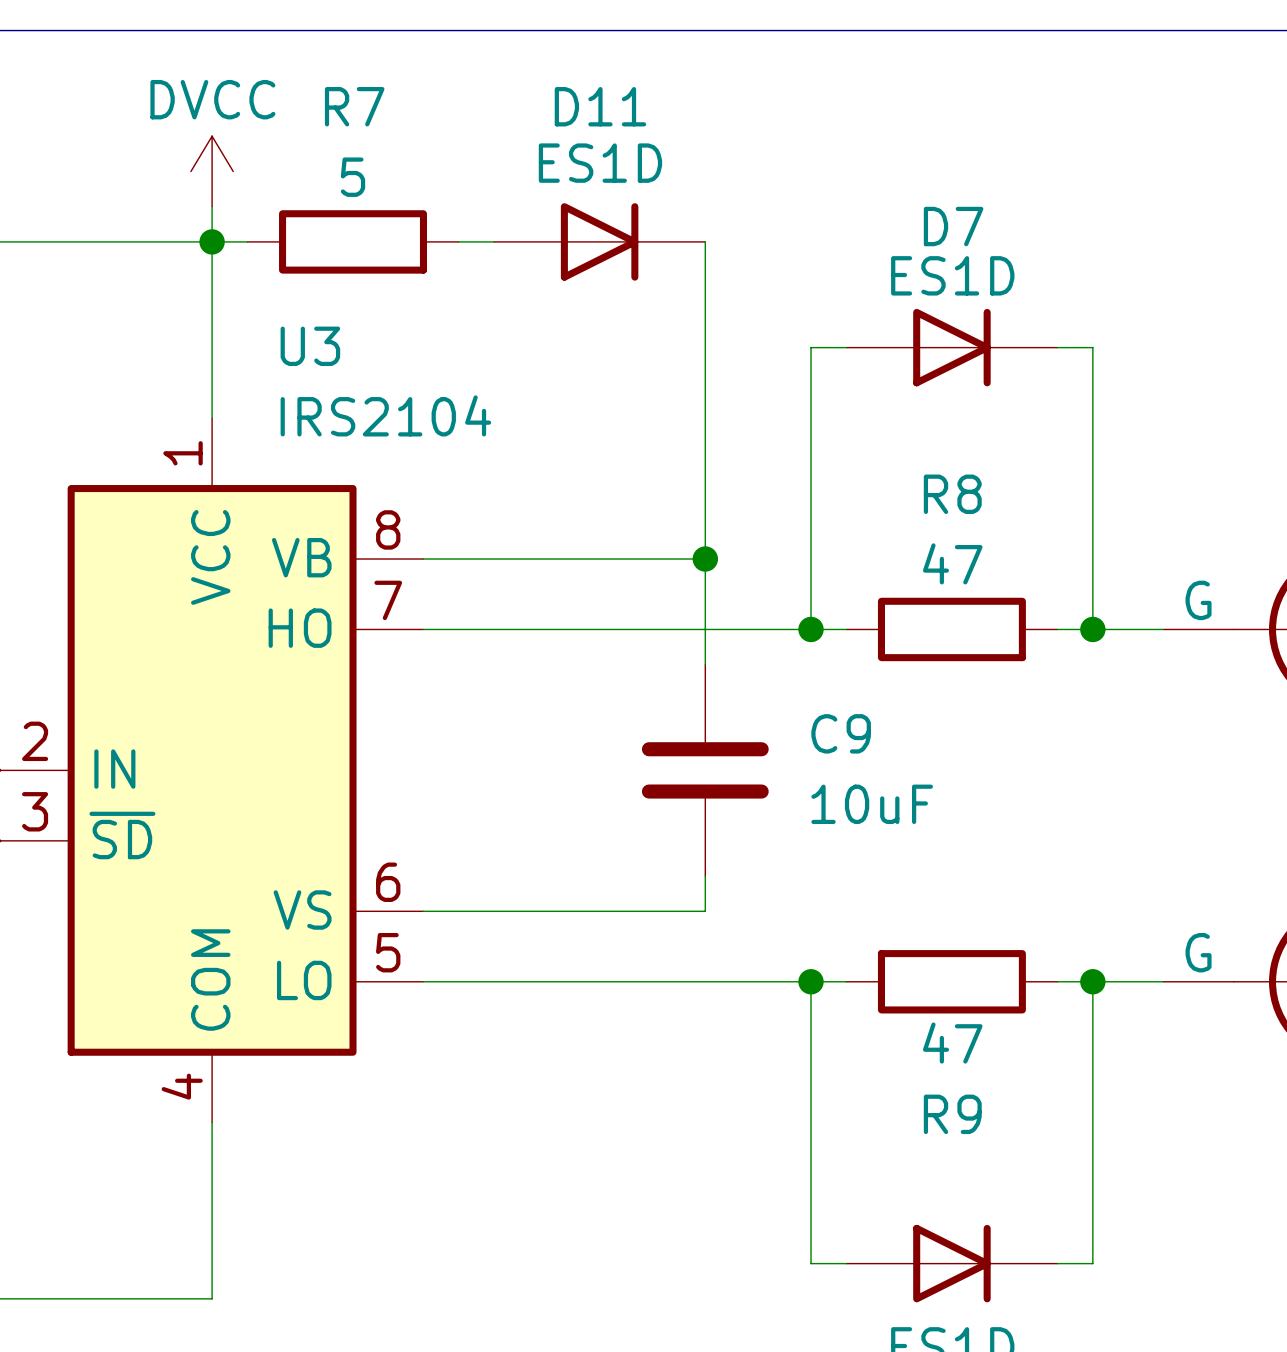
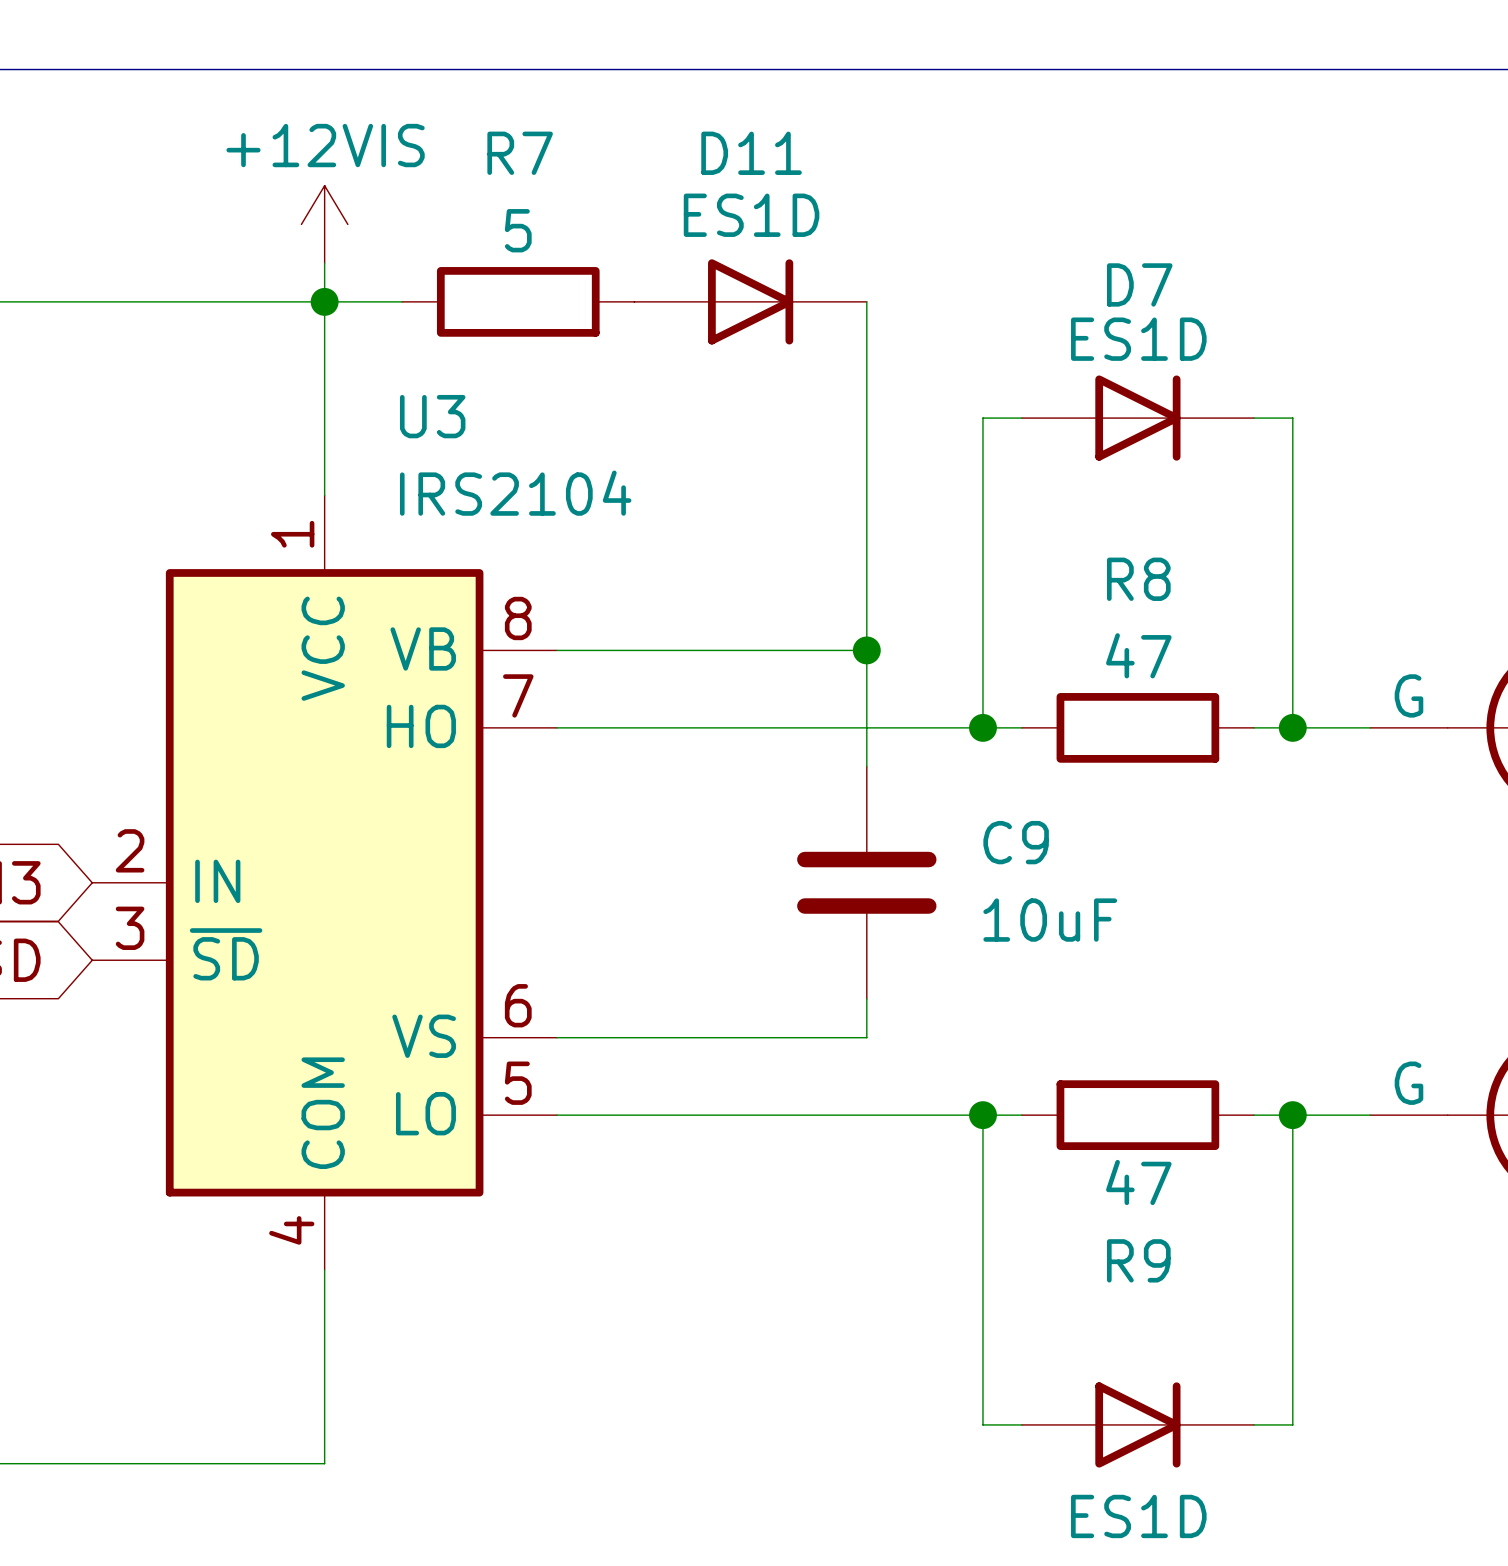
power symbol: DVCC (212, 171) -> +12VIS (324, 224)
R7 position: (353, 241) -> (518, 301)

